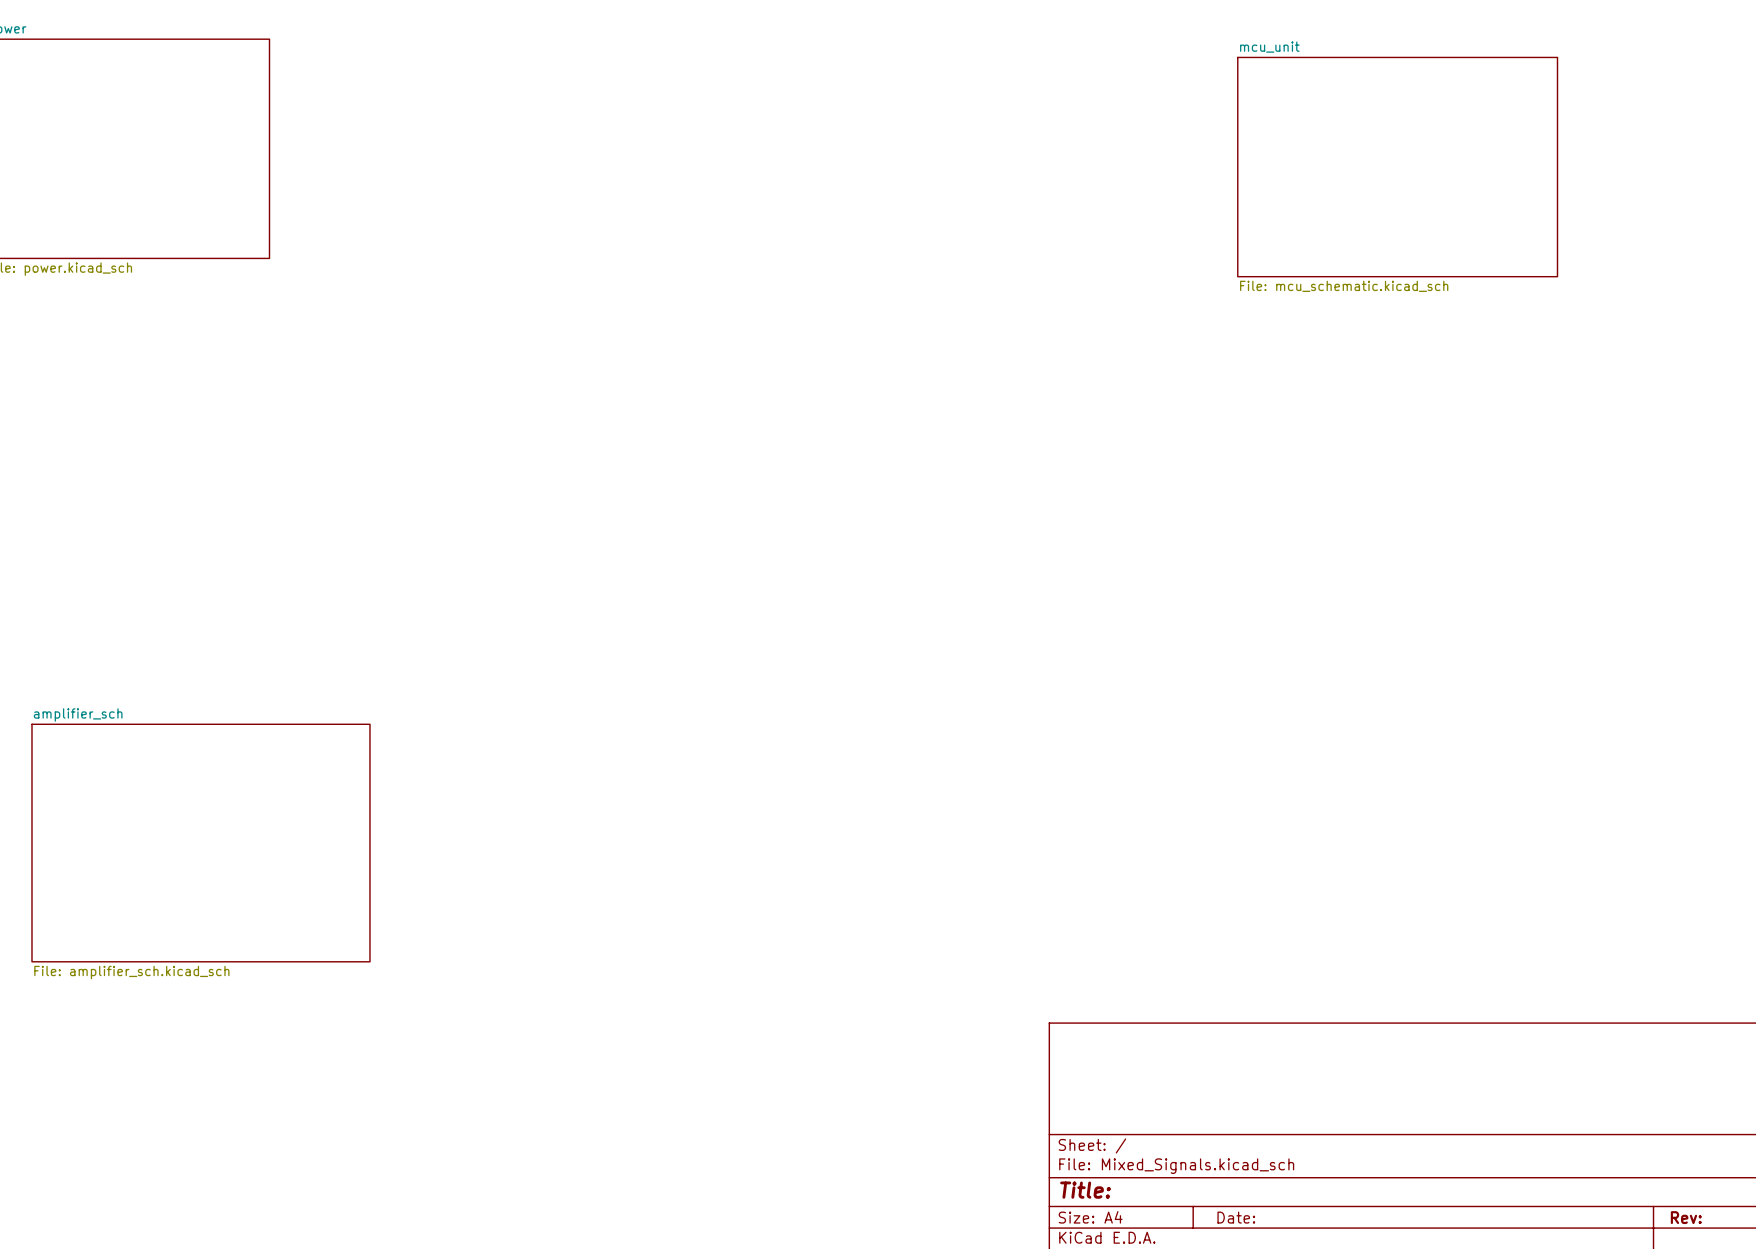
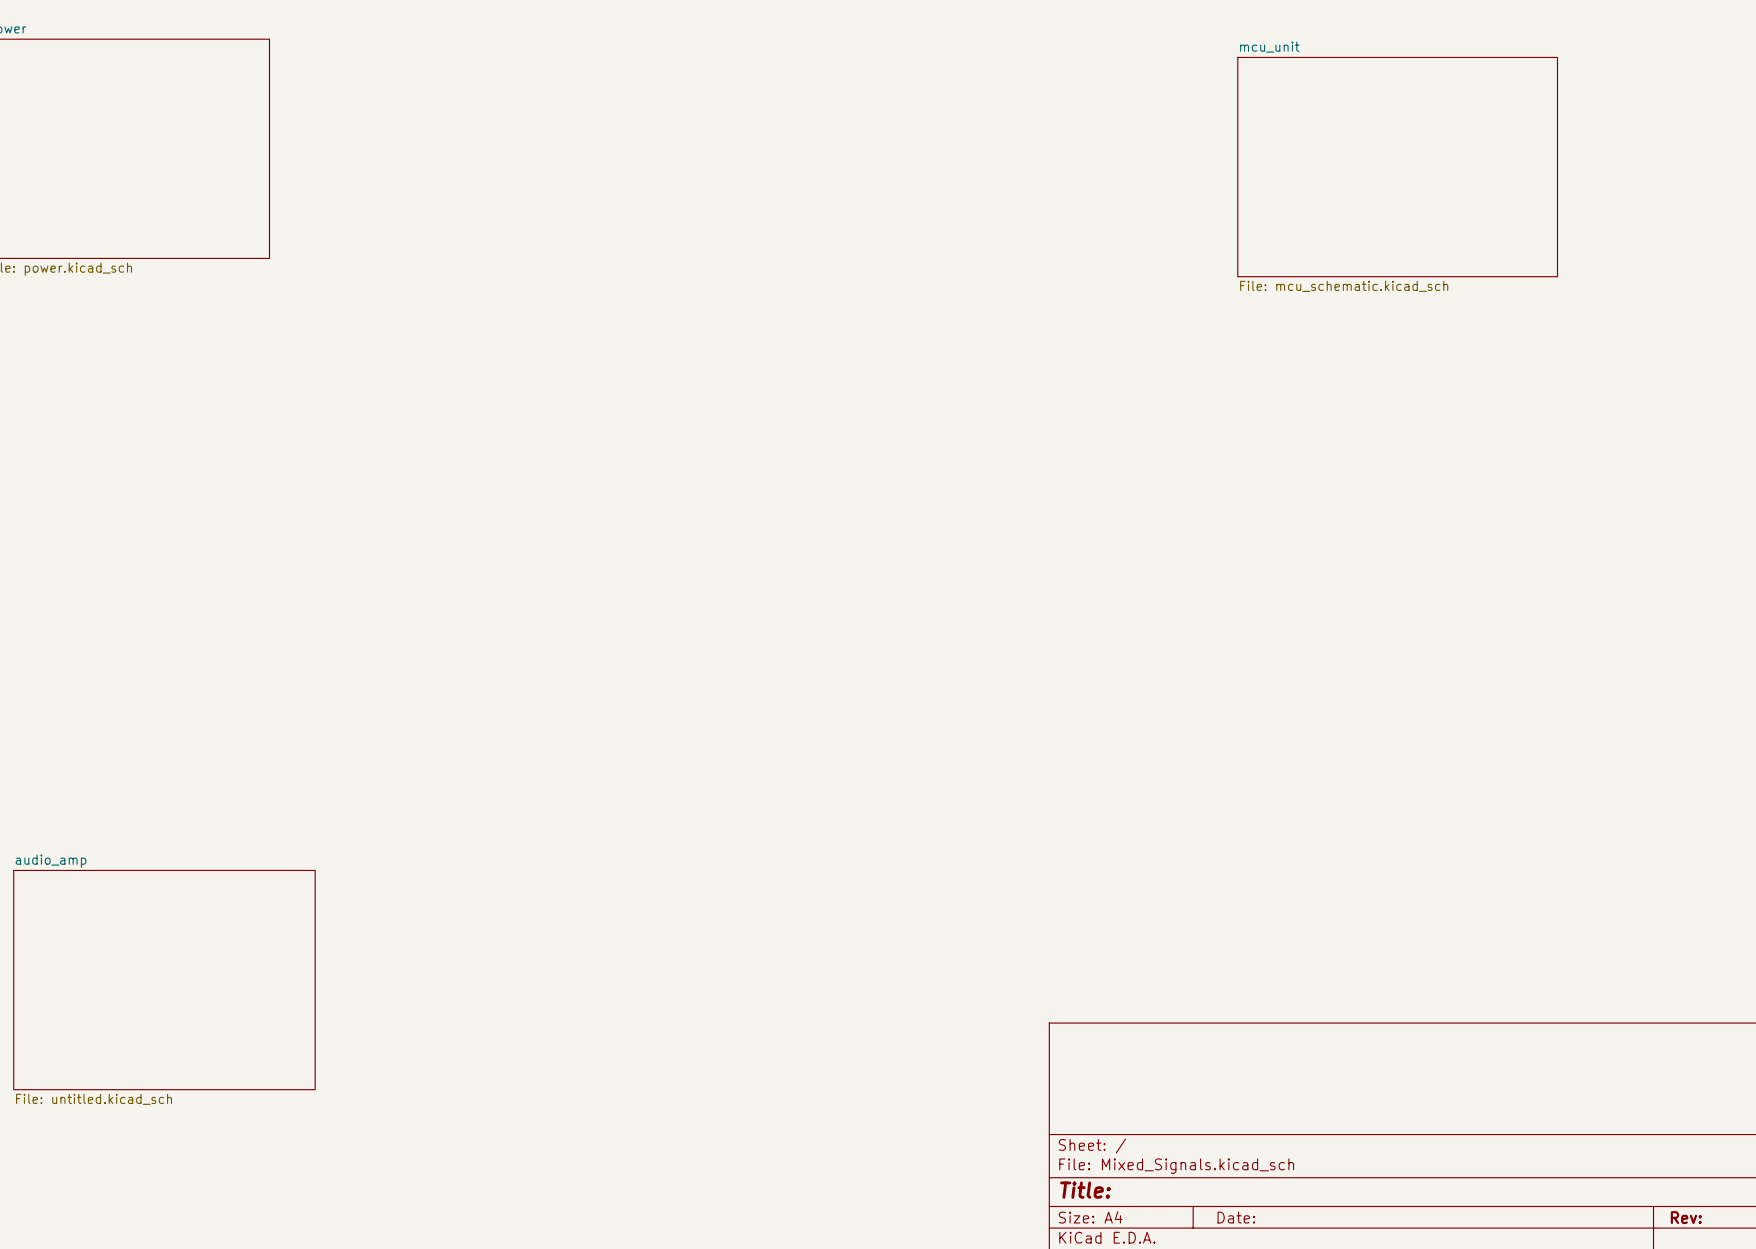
sheet amplifier_sch: File: amplifier_sch.kicad_sch (200, 843) -> none
sheet audio_amp: none -> File: untitled.kicad_sch (164, 980)

